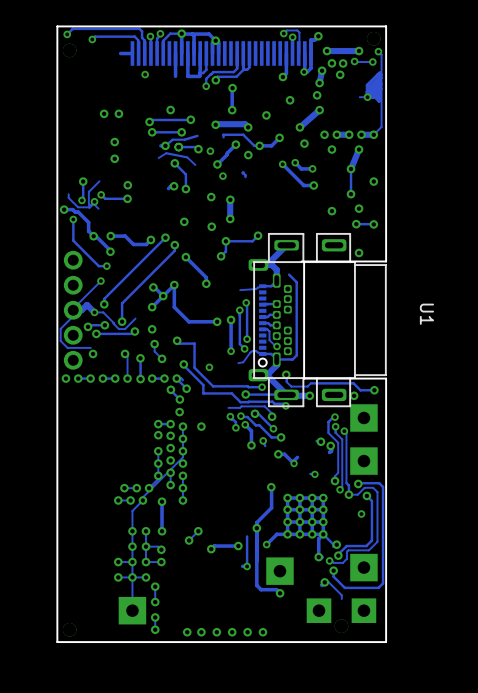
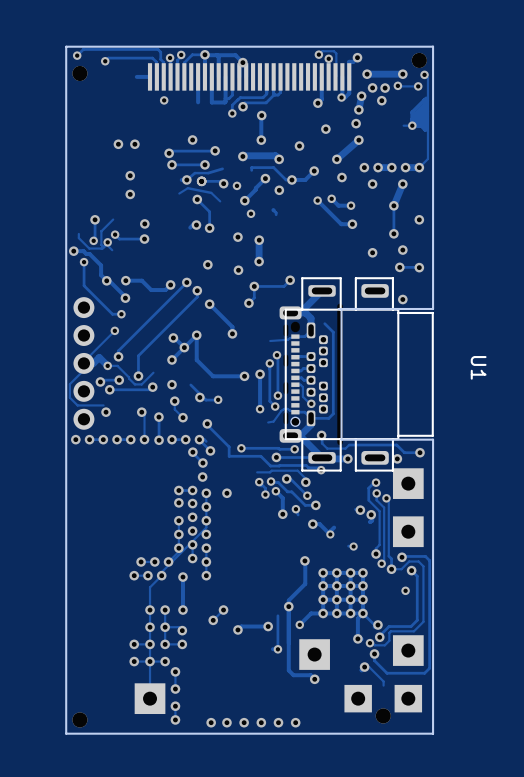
track: none -> (190, 384) (205, 400) (218, 399)
track: (177, 340) (179, 343) (194, 343) (194, 367) (214, 386) -> none
via: none -> (218, 399)
via: (209, 367) -> none
via: none -> (241, 448)

